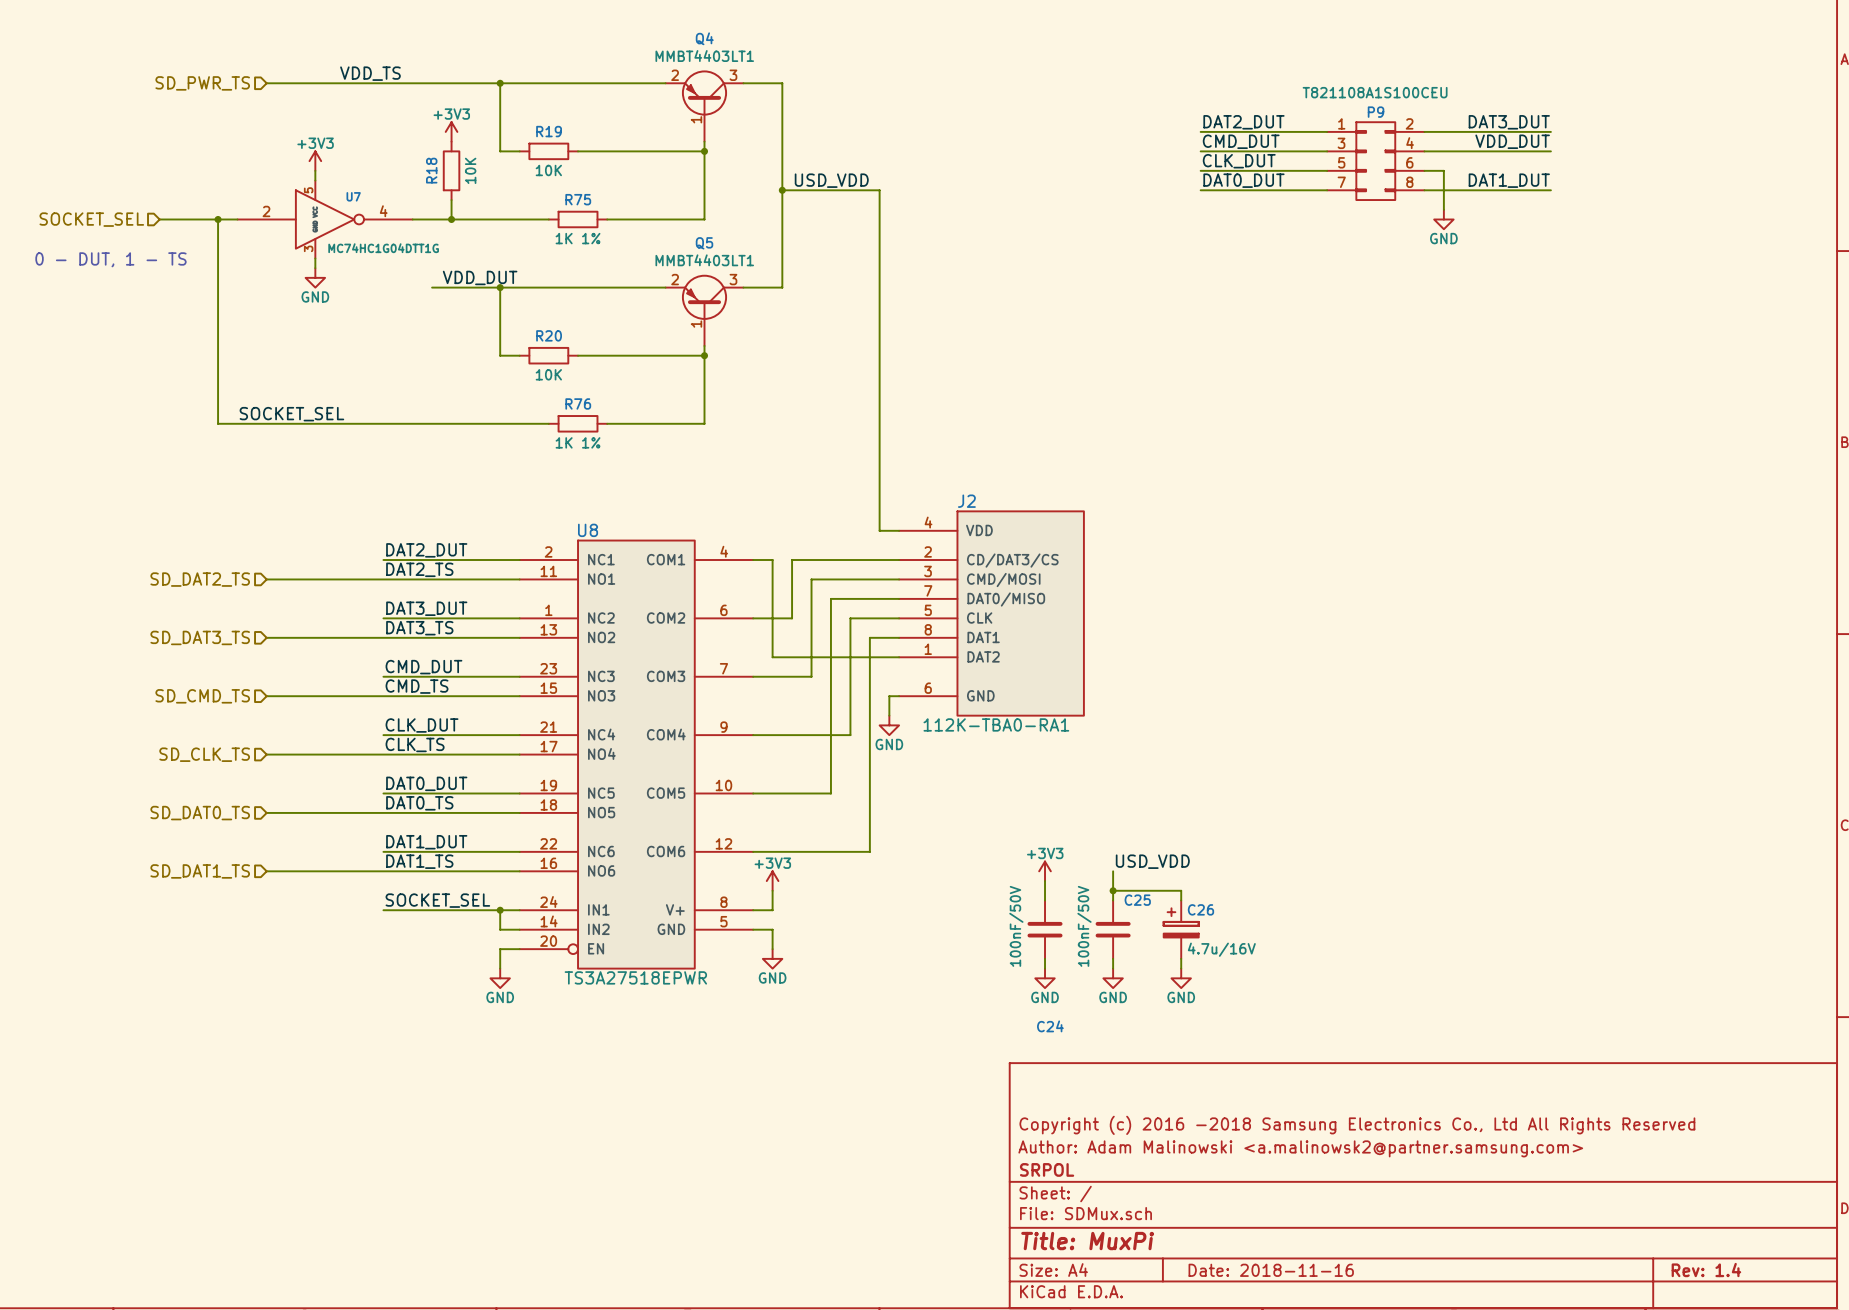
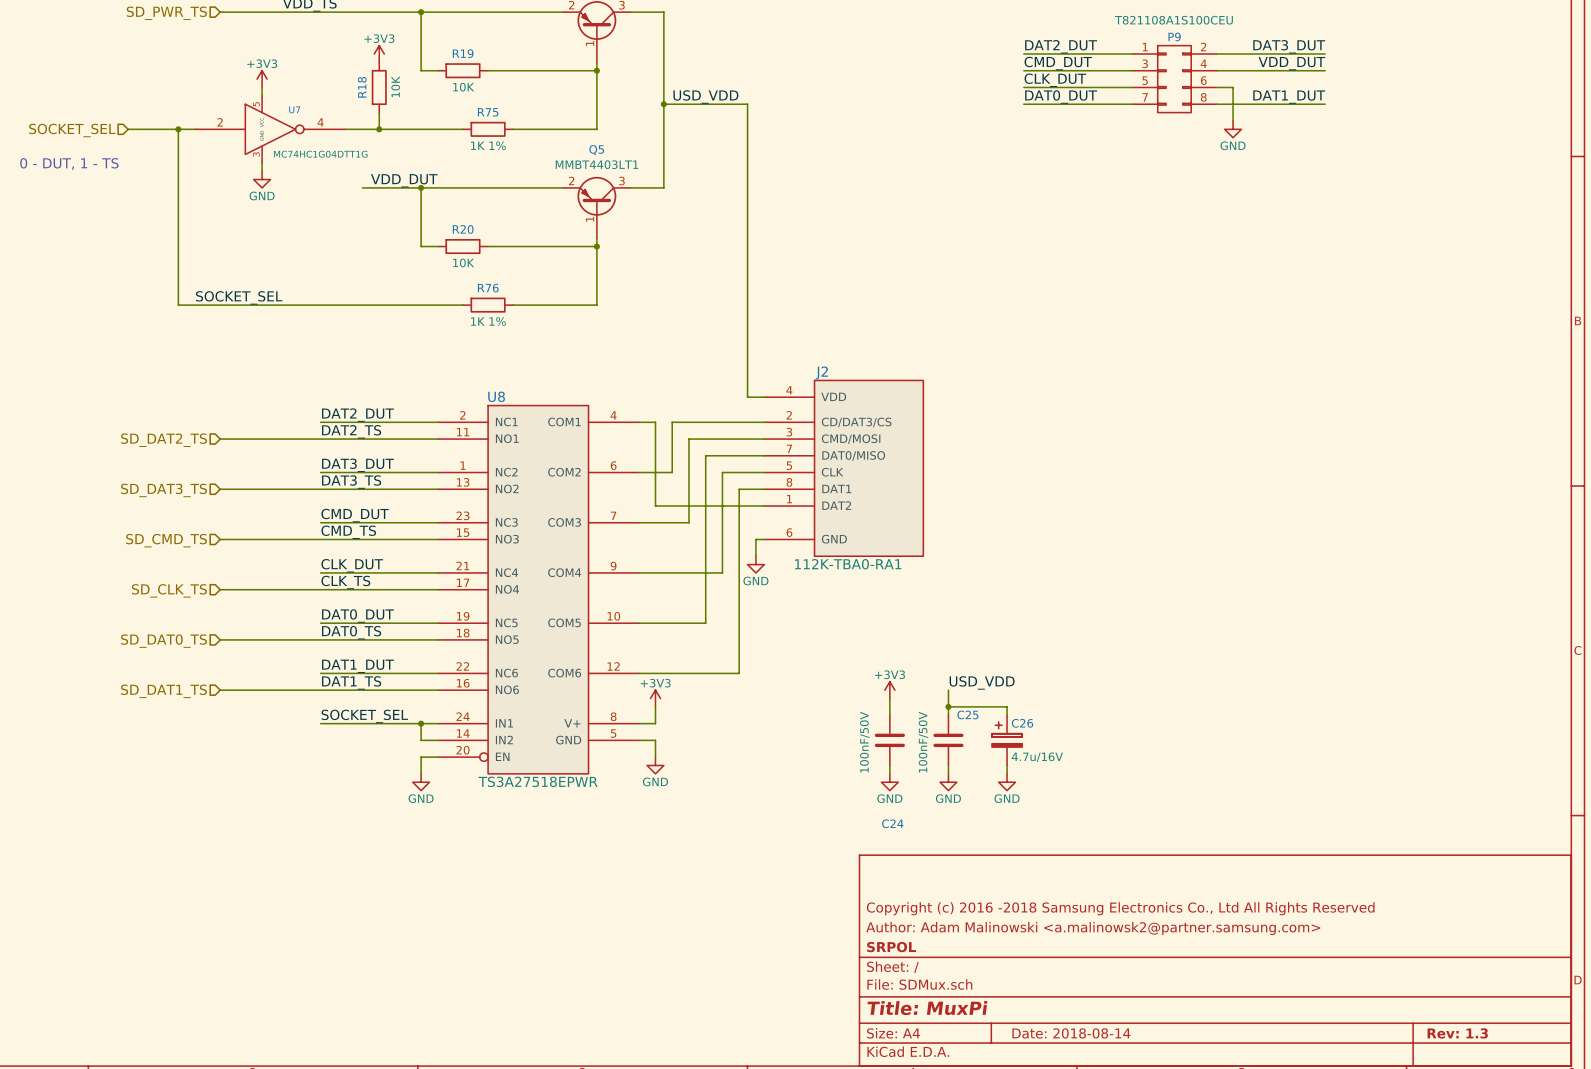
title block: Date: 2018-11-16 (1271, 1270) -> Date: 2018-08-14 (1071, 1033)
title block: Rev: 1.4 (1706, 1270) -> Rev: 1.3 (1457, 1033)

